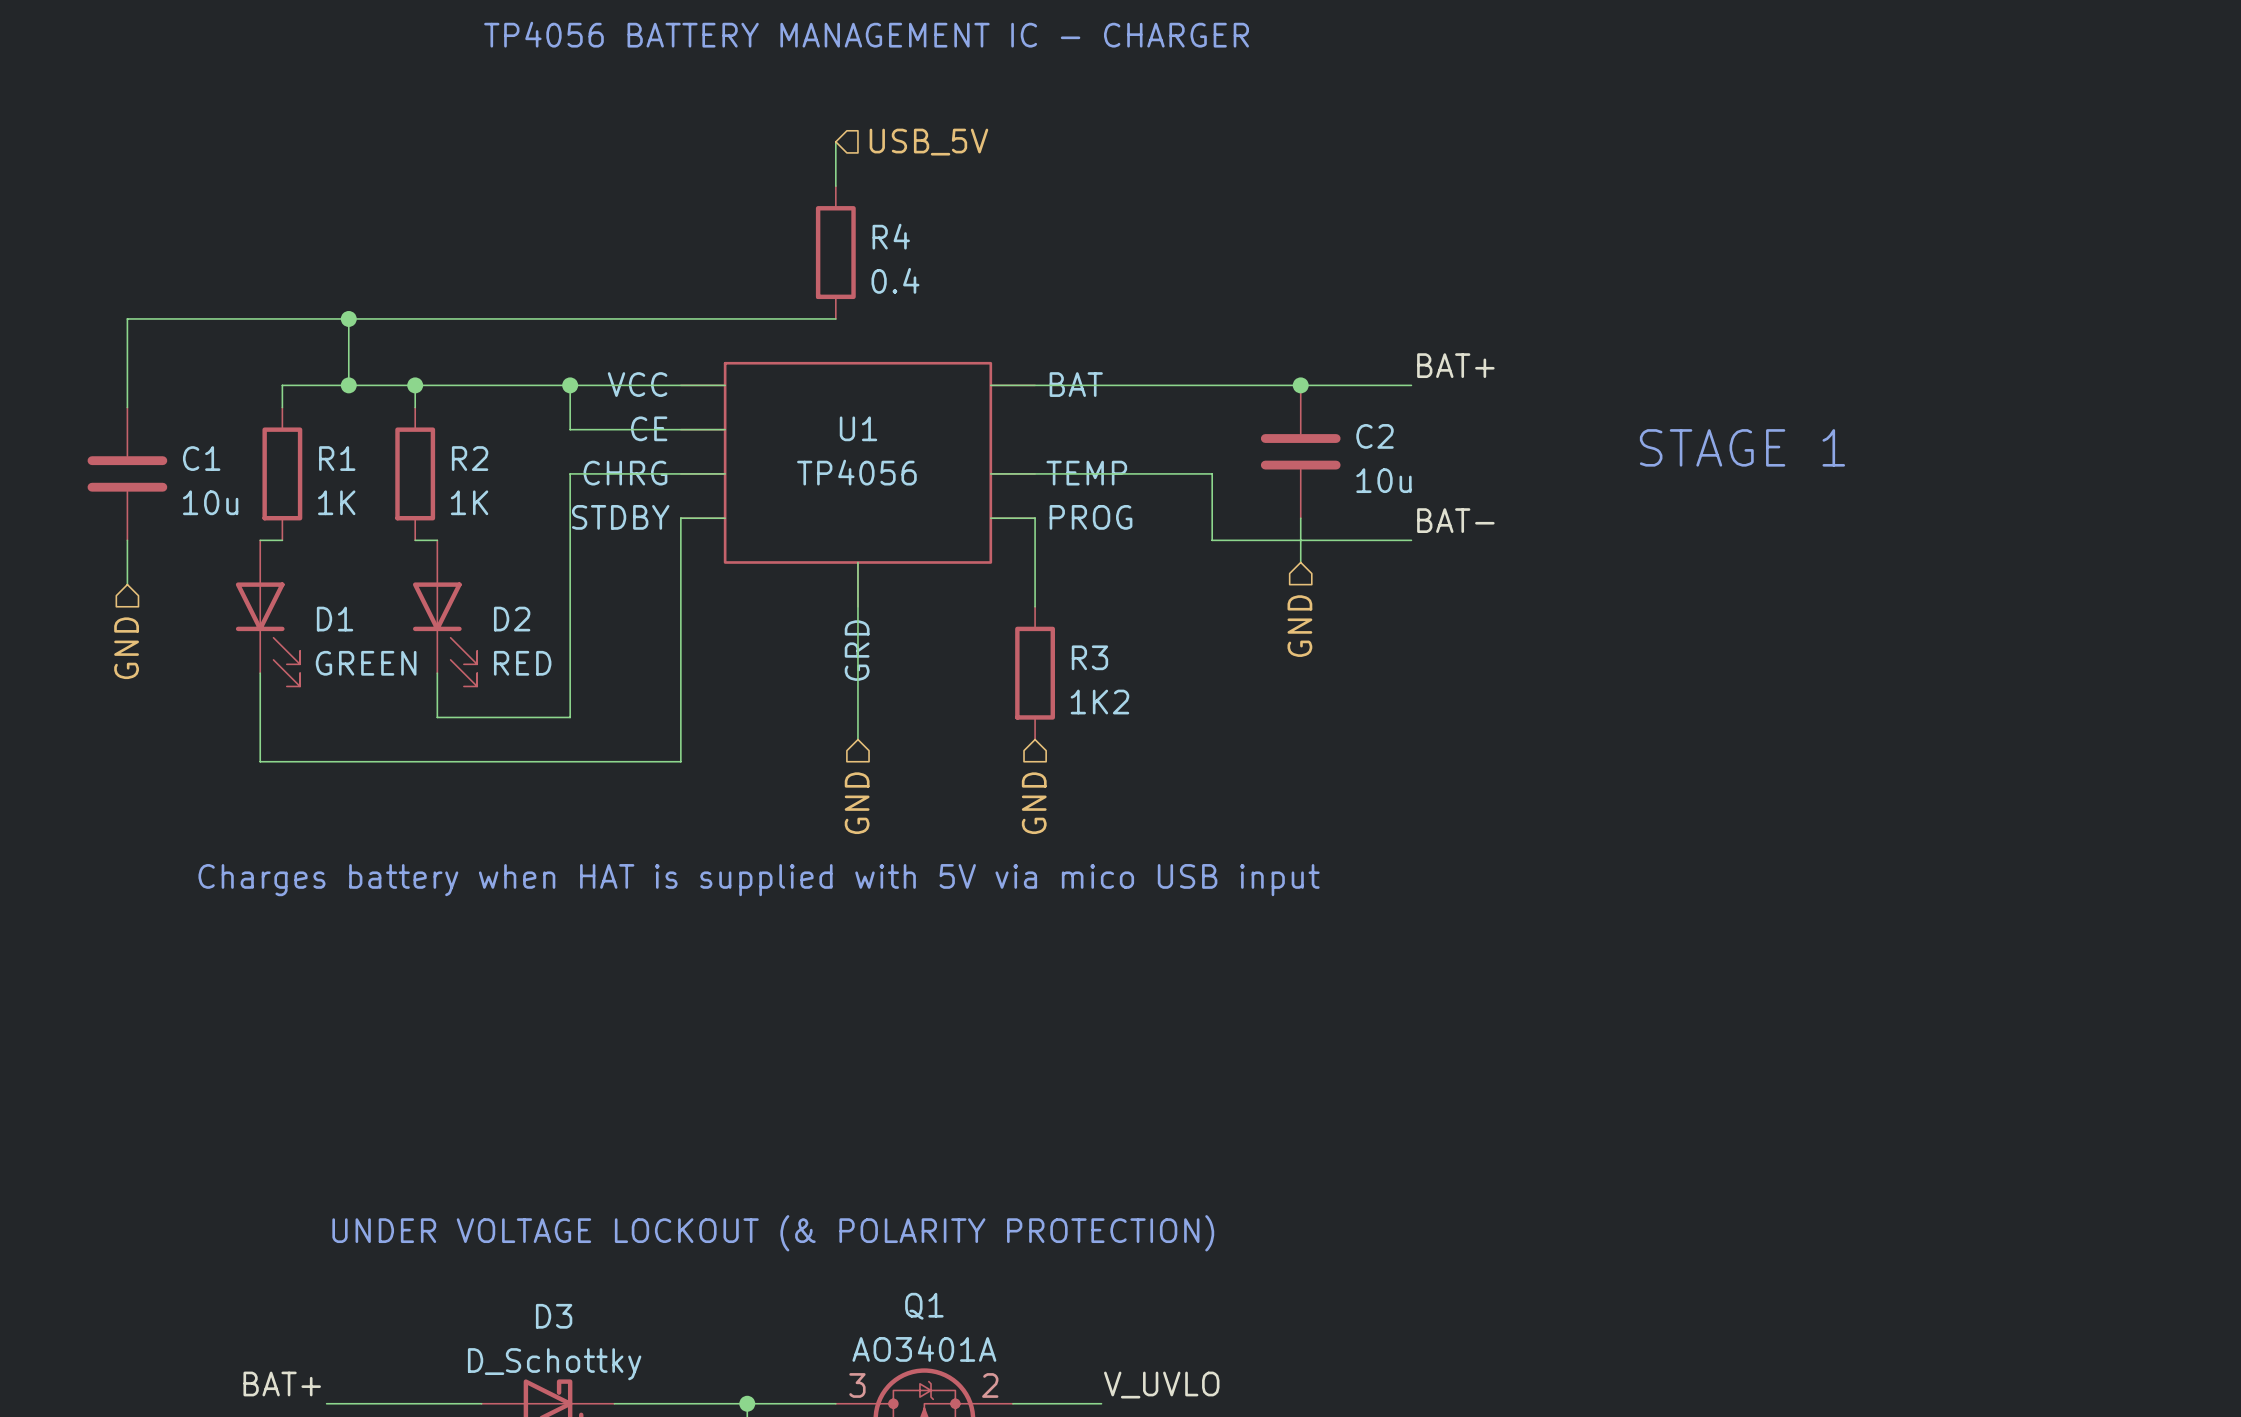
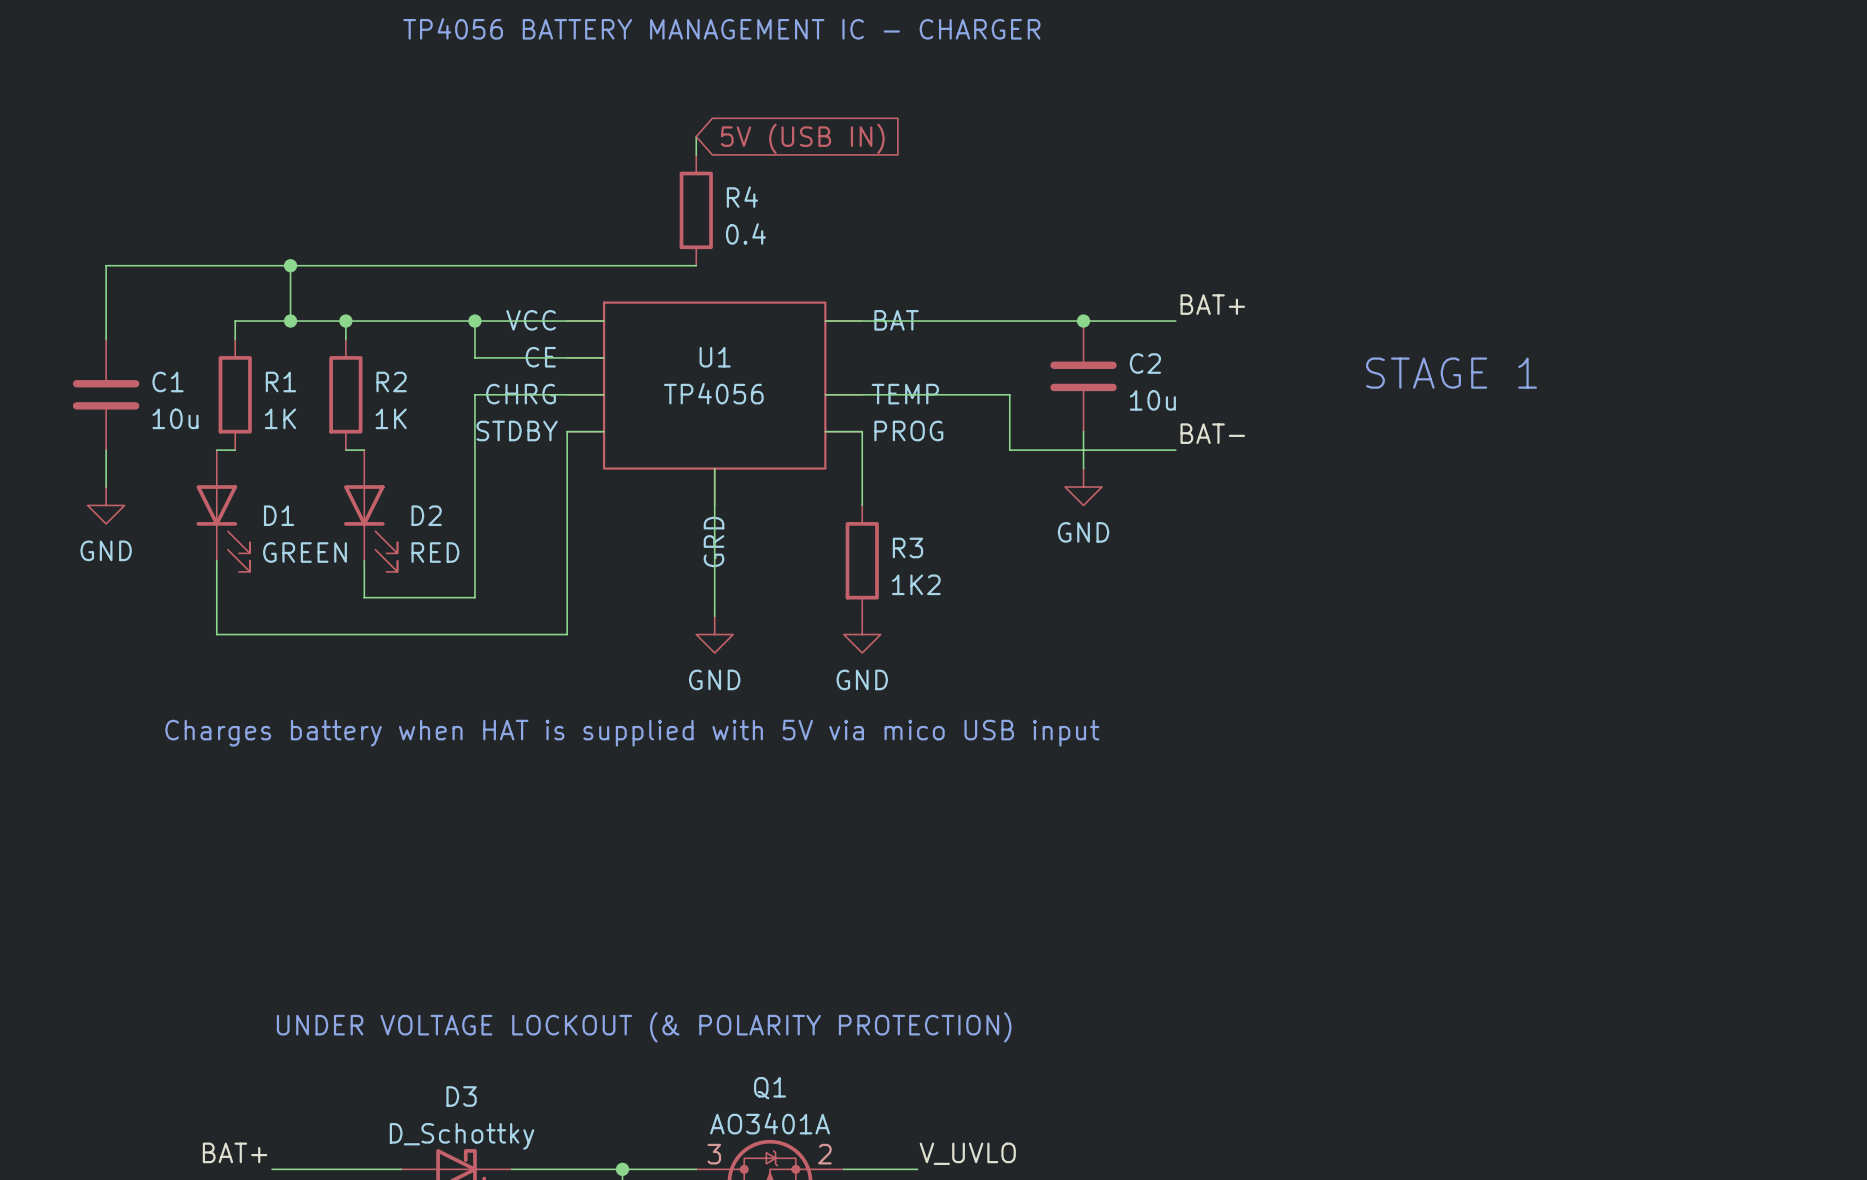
wire: (835, 141) (835, 164) -> none
hierarchical label: USB_5V (928, 142) -> none
global label: none -> 5V (USB IN) (802, 138)
power symbol: none -> GND (1083, 487)
power symbol: none -> GND (106, 505)
hierarchical label: GND (1299, 626) -> none
hierarchical label: GND (126, 648) -> none
power symbol: none -> GND (714, 634)
power symbol: none -> GND (862, 634)
hierarchical label: GND (857, 803) -> none
hierarchical label: GND (1034, 803) -> none

